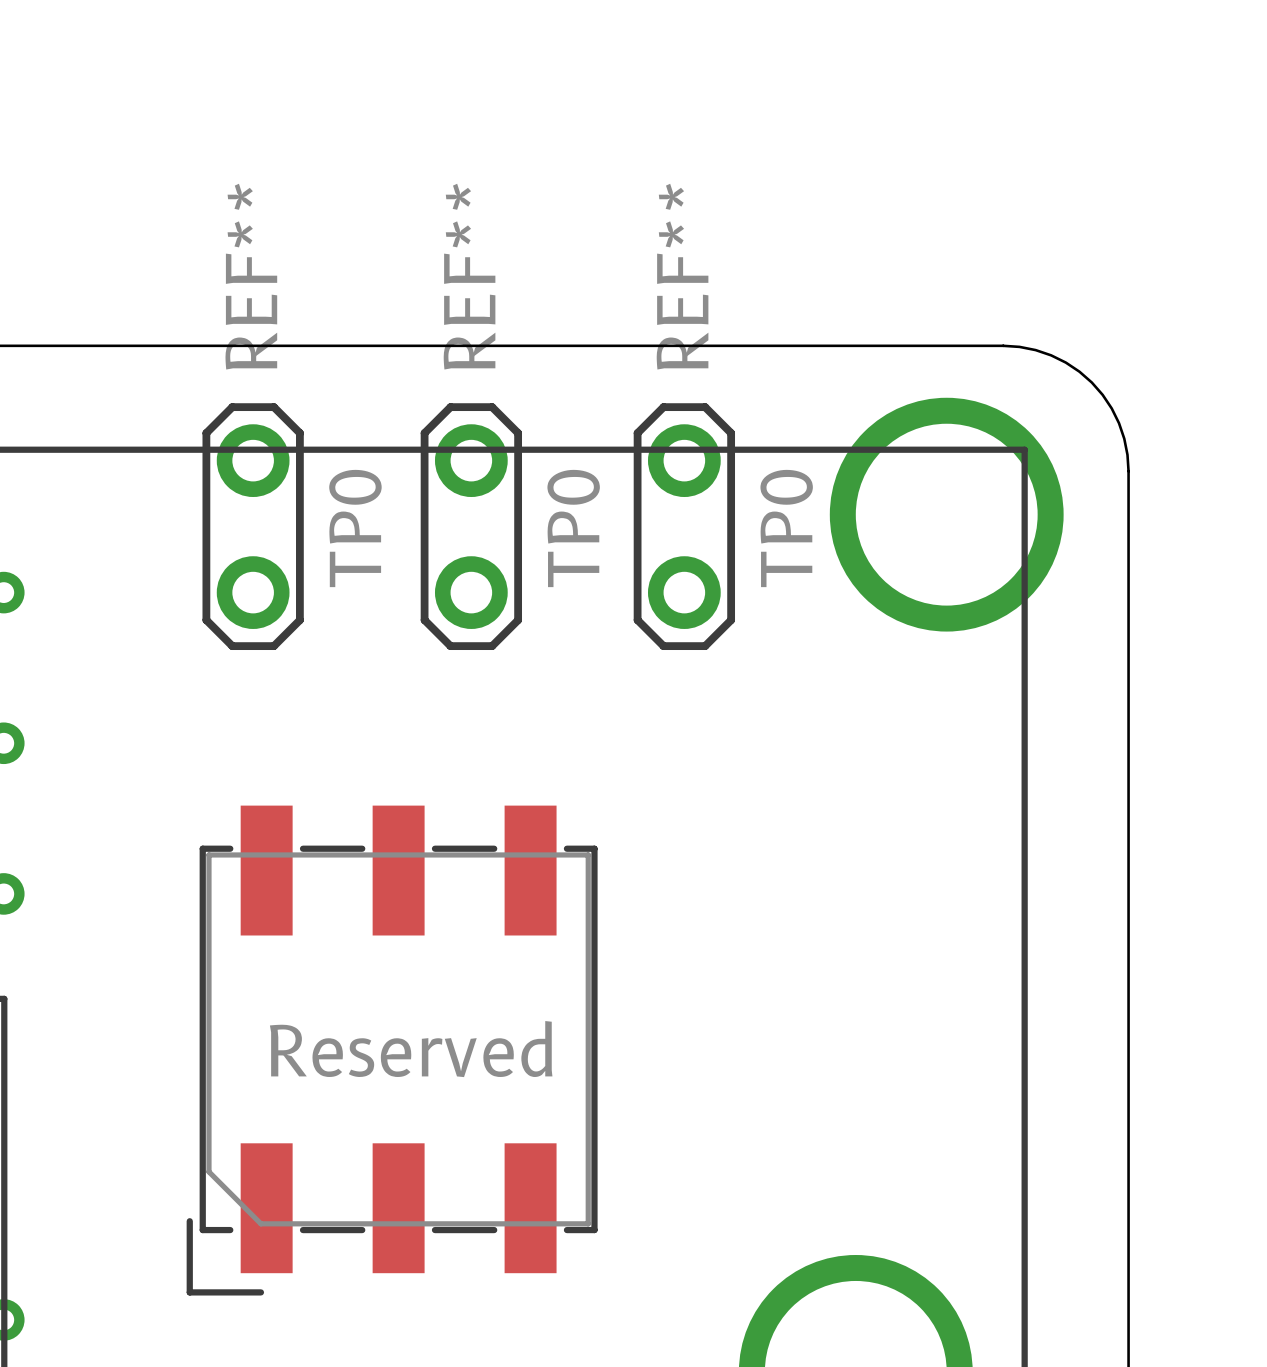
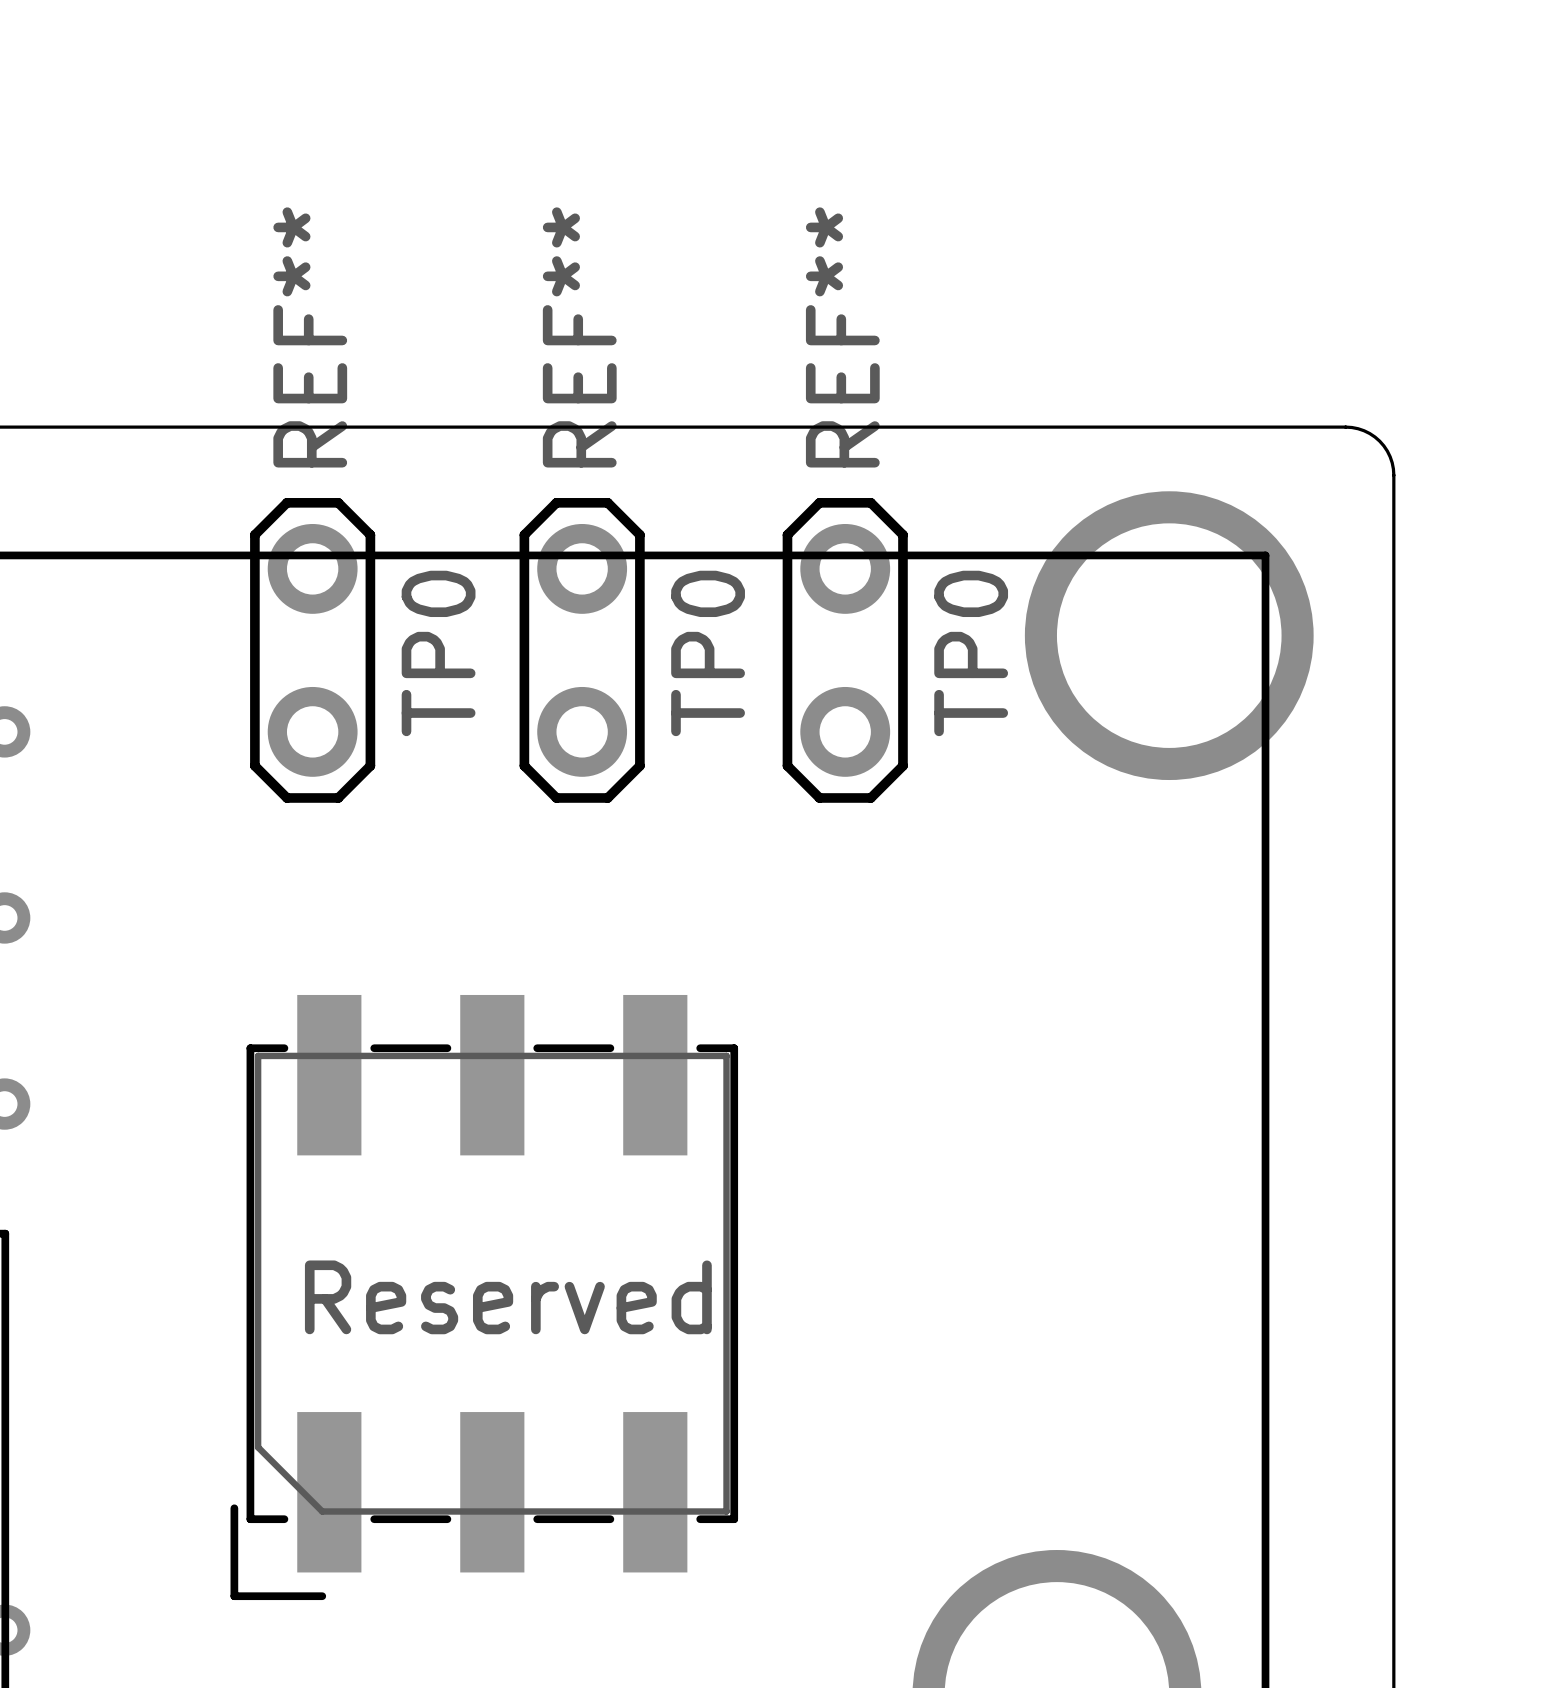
board edge: (1003, 345) (1019, 346) (1051, 355) (1065, 362) (1091, 382) (1102, 394) (1119, 423) (1127, 454) (1128, 471) -> (1239, 427) (1351, 427) (1364, 430) (1379, 441) (1387, 451) (1393, 468) (1393, 581)

